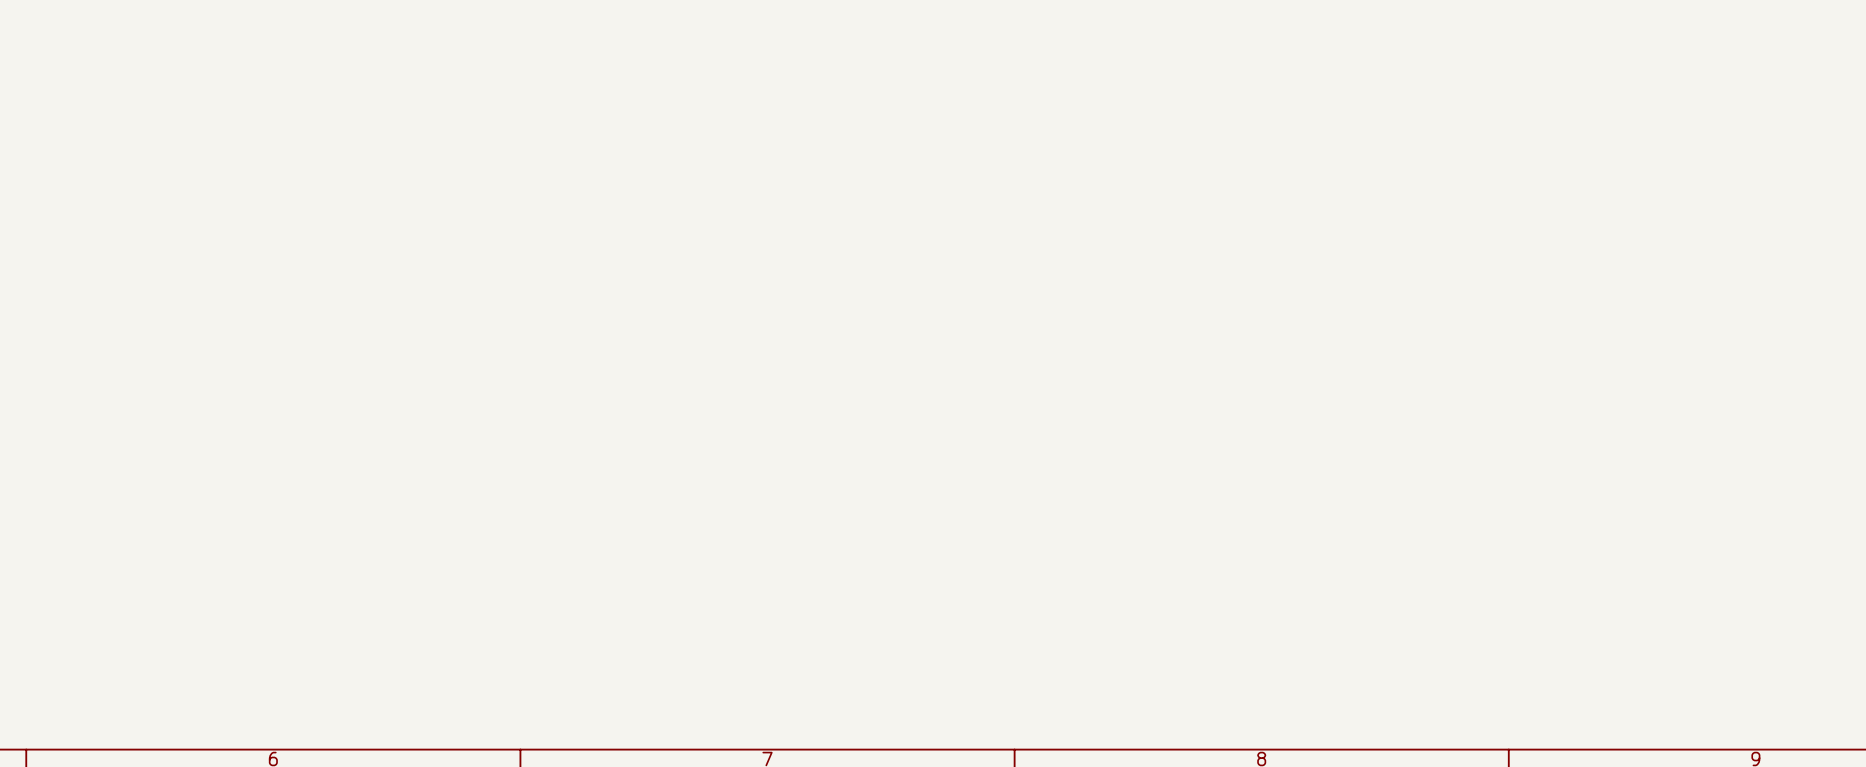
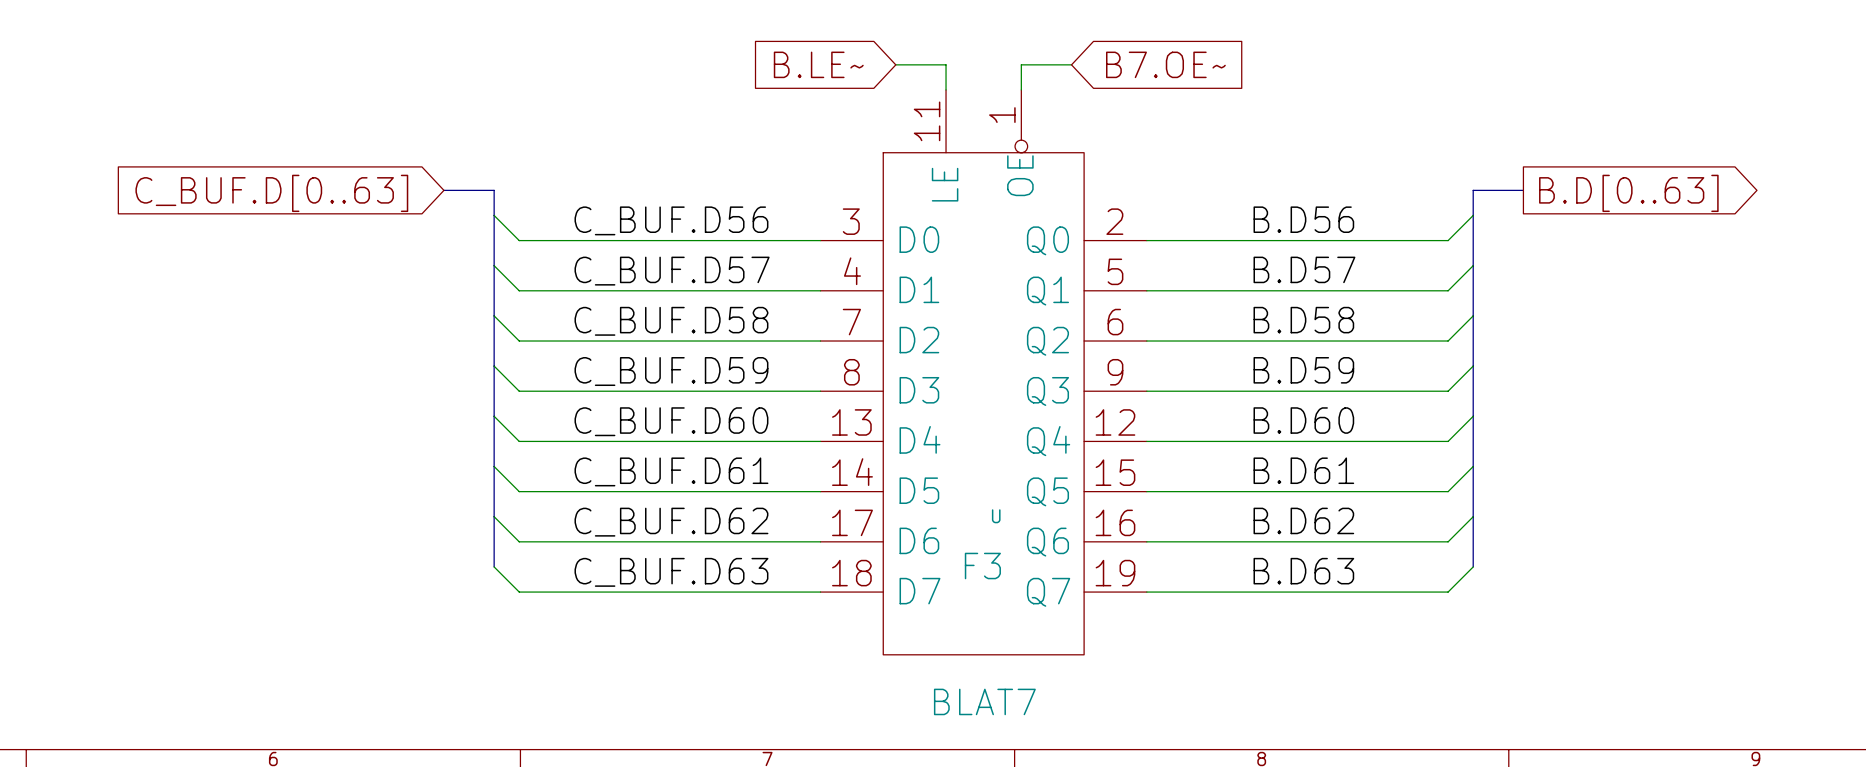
global label: none -> B.LE~ (818, 64)
wire: none -> (895, 64) (946, 64) (946, 89)
wire: none -> (1071, 64) (1021, 64) (1021, 89)
global label: none -> B7.OE~ (1165, 64)
bus: none -> (443, 190) (494, 190) (494, 566)
bus: none -> (1523, 190) (1473, 190) (1473, 566)
global label: none -> C_BUF.D[0..63] (271, 193)
global label: none -> B.D[0..63] (1628, 193)
wire: none -> (494, 215) (519, 240) (820, 240)
wire: none -> (1473, 215) (1448, 240) (1146, 240)
label: none -> B.D56 (1303, 219)
label: none -> C_BUF.D56 (671, 220)
wire: none -> (494, 265) (519, 290) (820, 290)
wire: none -> (1473, 265) (1448, 290) (1146, 290)
label: none -> B.D57 (1304, 269)
label: none -> C_BUF.D57 (672, 271)
wire: none -> (494, 315) (519, 341) (820, 341)
wire: none -> (1473, 315) (1448, 341) (1146, 341)
label: none -> B.D58 (1303, 320)
label: none -> C_BUF.D58 (671, 321)
wire: none -> (494, 366) (519, 391) (820, 391)
wire: none -> (1473, 366) (1448, 391) (1146, 391)
label: none -> B.D59 (1303, 370)
label: none -> C_BUF.D59 (671, 371)
U: none -> (983, 372)
wire: none -> (494, 416) (519, 441) (820, 441)
wire: none -> (1473, 416) (1448, 441) (1146, 441)
label: none -> B.D60 (1303, 420)
label: none -> C_BUF.D60 (671, 421)
wire: none -> (494, 466) (519, 491) (820, 491)
wire: none -> (1473, 466) (1448, 491) (1146, 491)
label: none -> B.D61 (1303, 470)
label: none -> C_BUF.D61 (671, 471)
wire: none -> (494, 516) (519, 541) (820, 541)
wire: none -> (1473, 516) (1448, 541) (1146, 541)
label: none -> B.D62 (1303, 520)
label: none -> C_BUF.D62 (671, 522)
wire: none -> (494, 566) (519, 592) (820, 592)
wire: none -> (1473, 566) (1448, 592) (1146, 592)
label: none -> B.D63 (1303, 571)
label: none -> C_BUF.D63 (671, 572)

